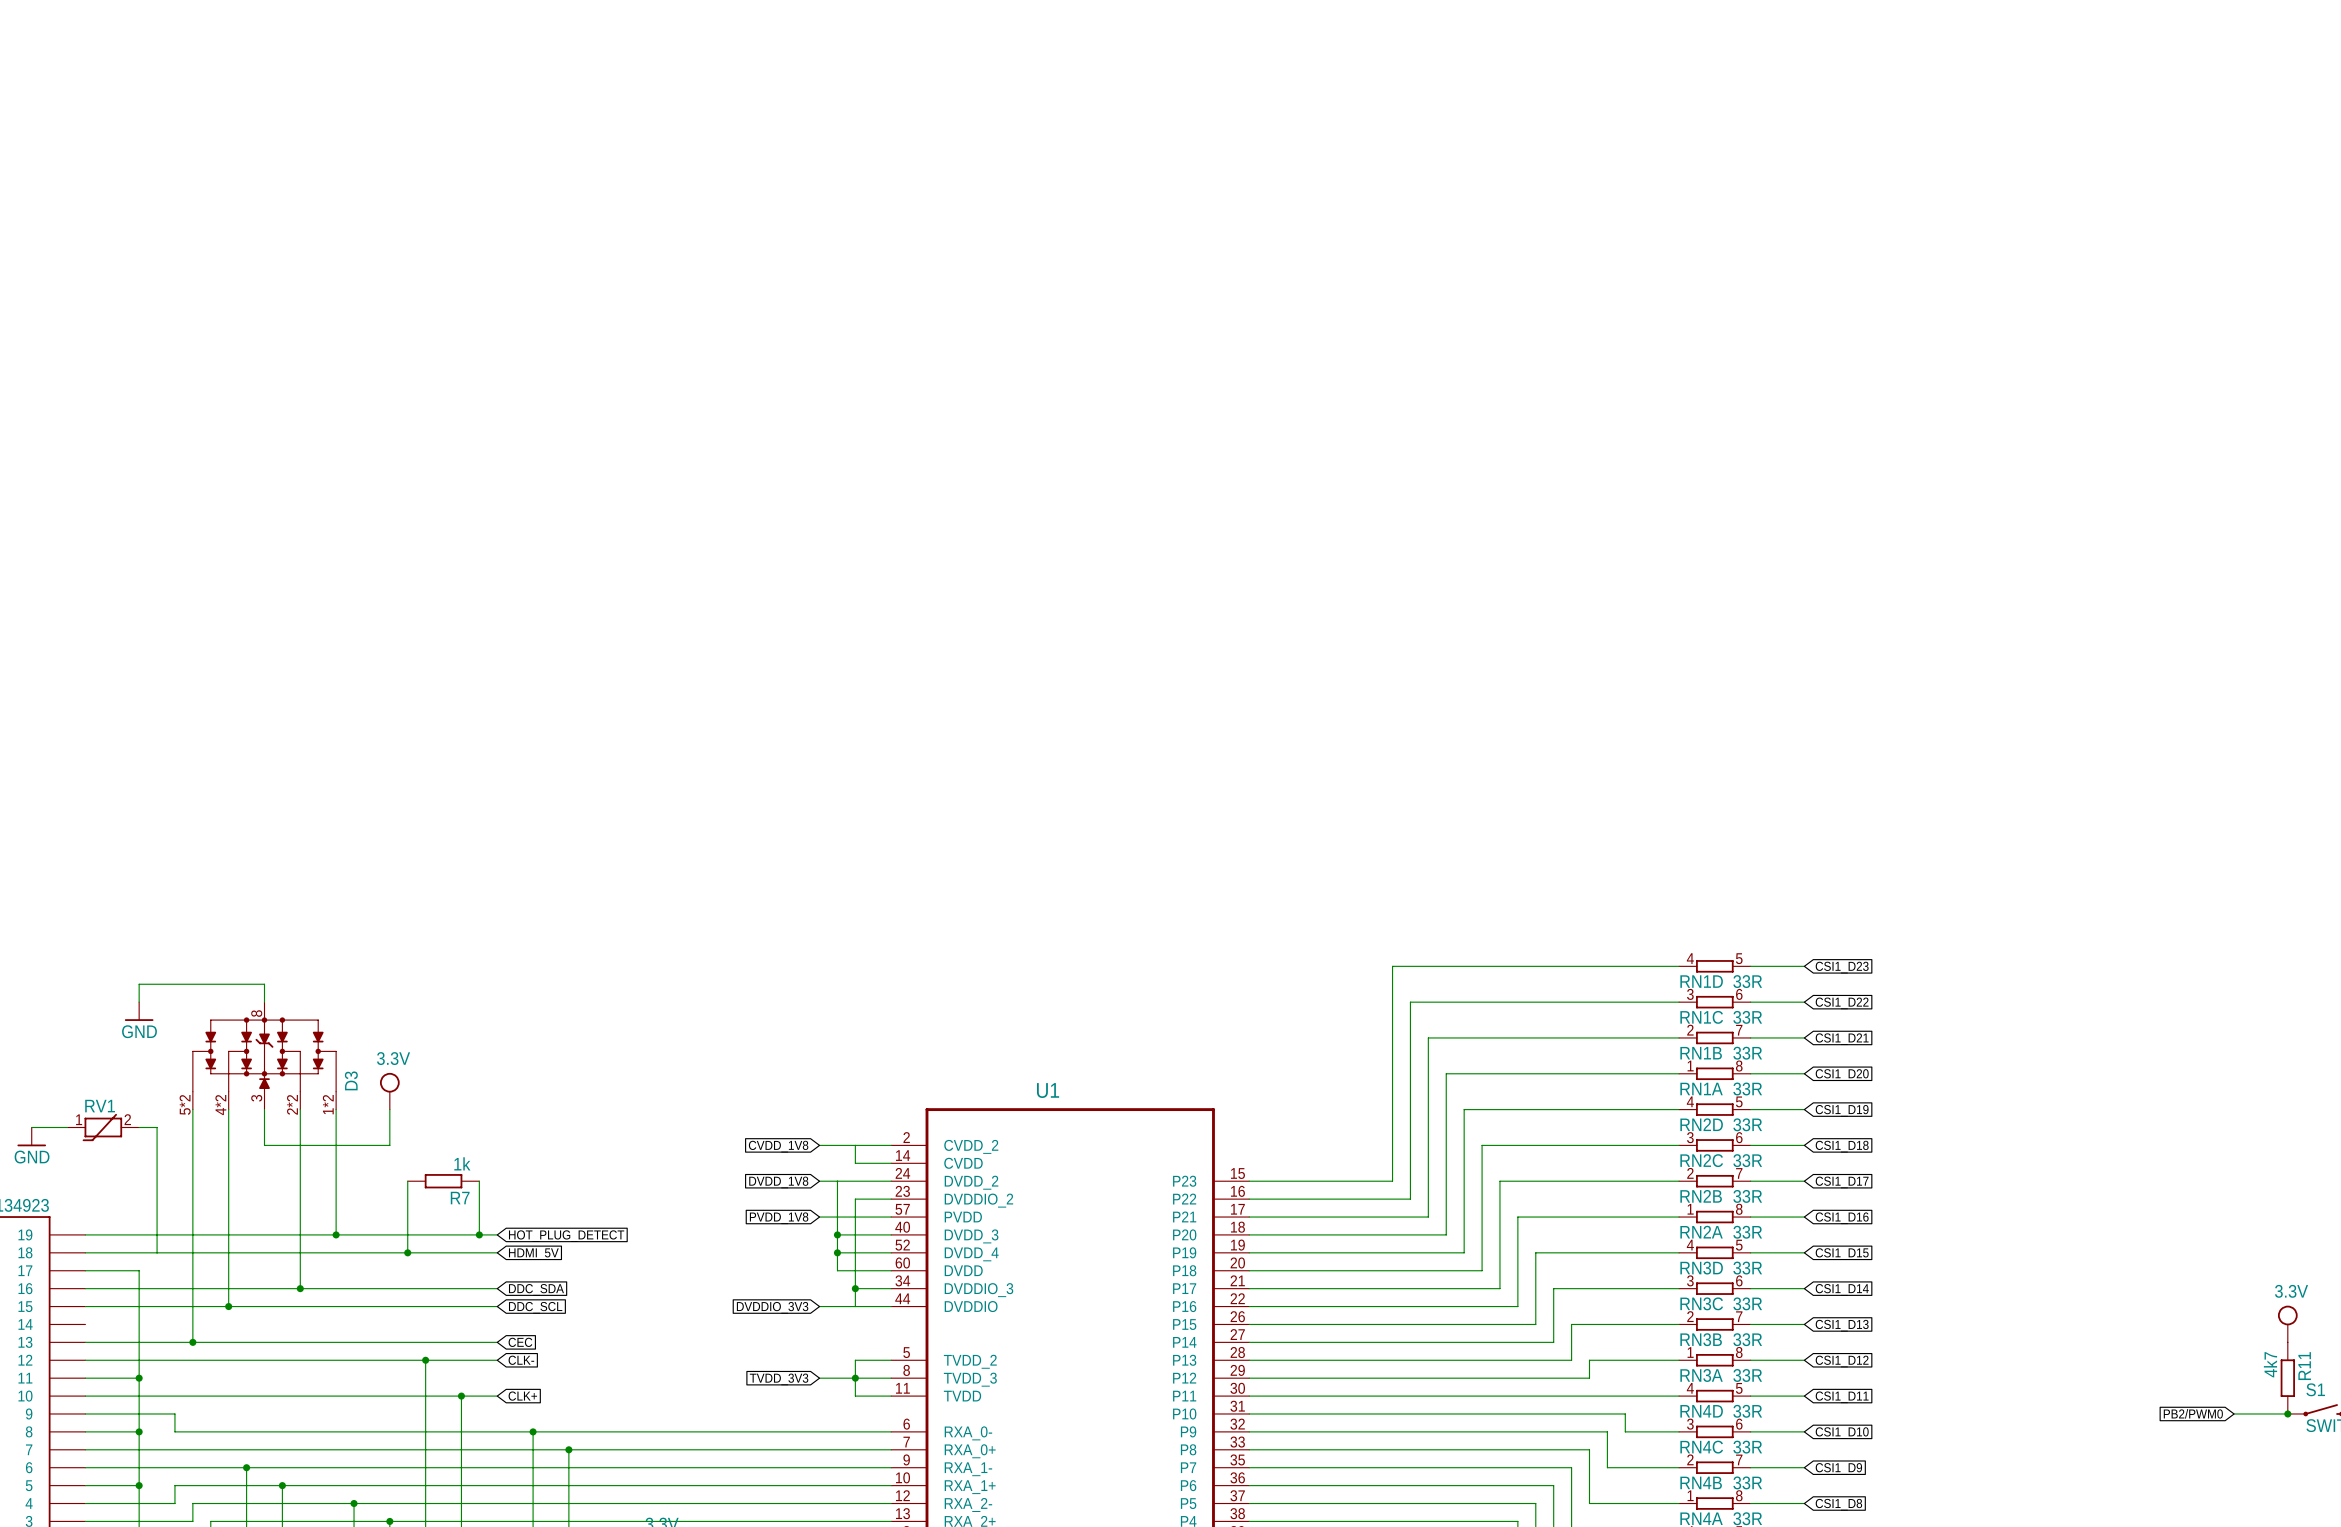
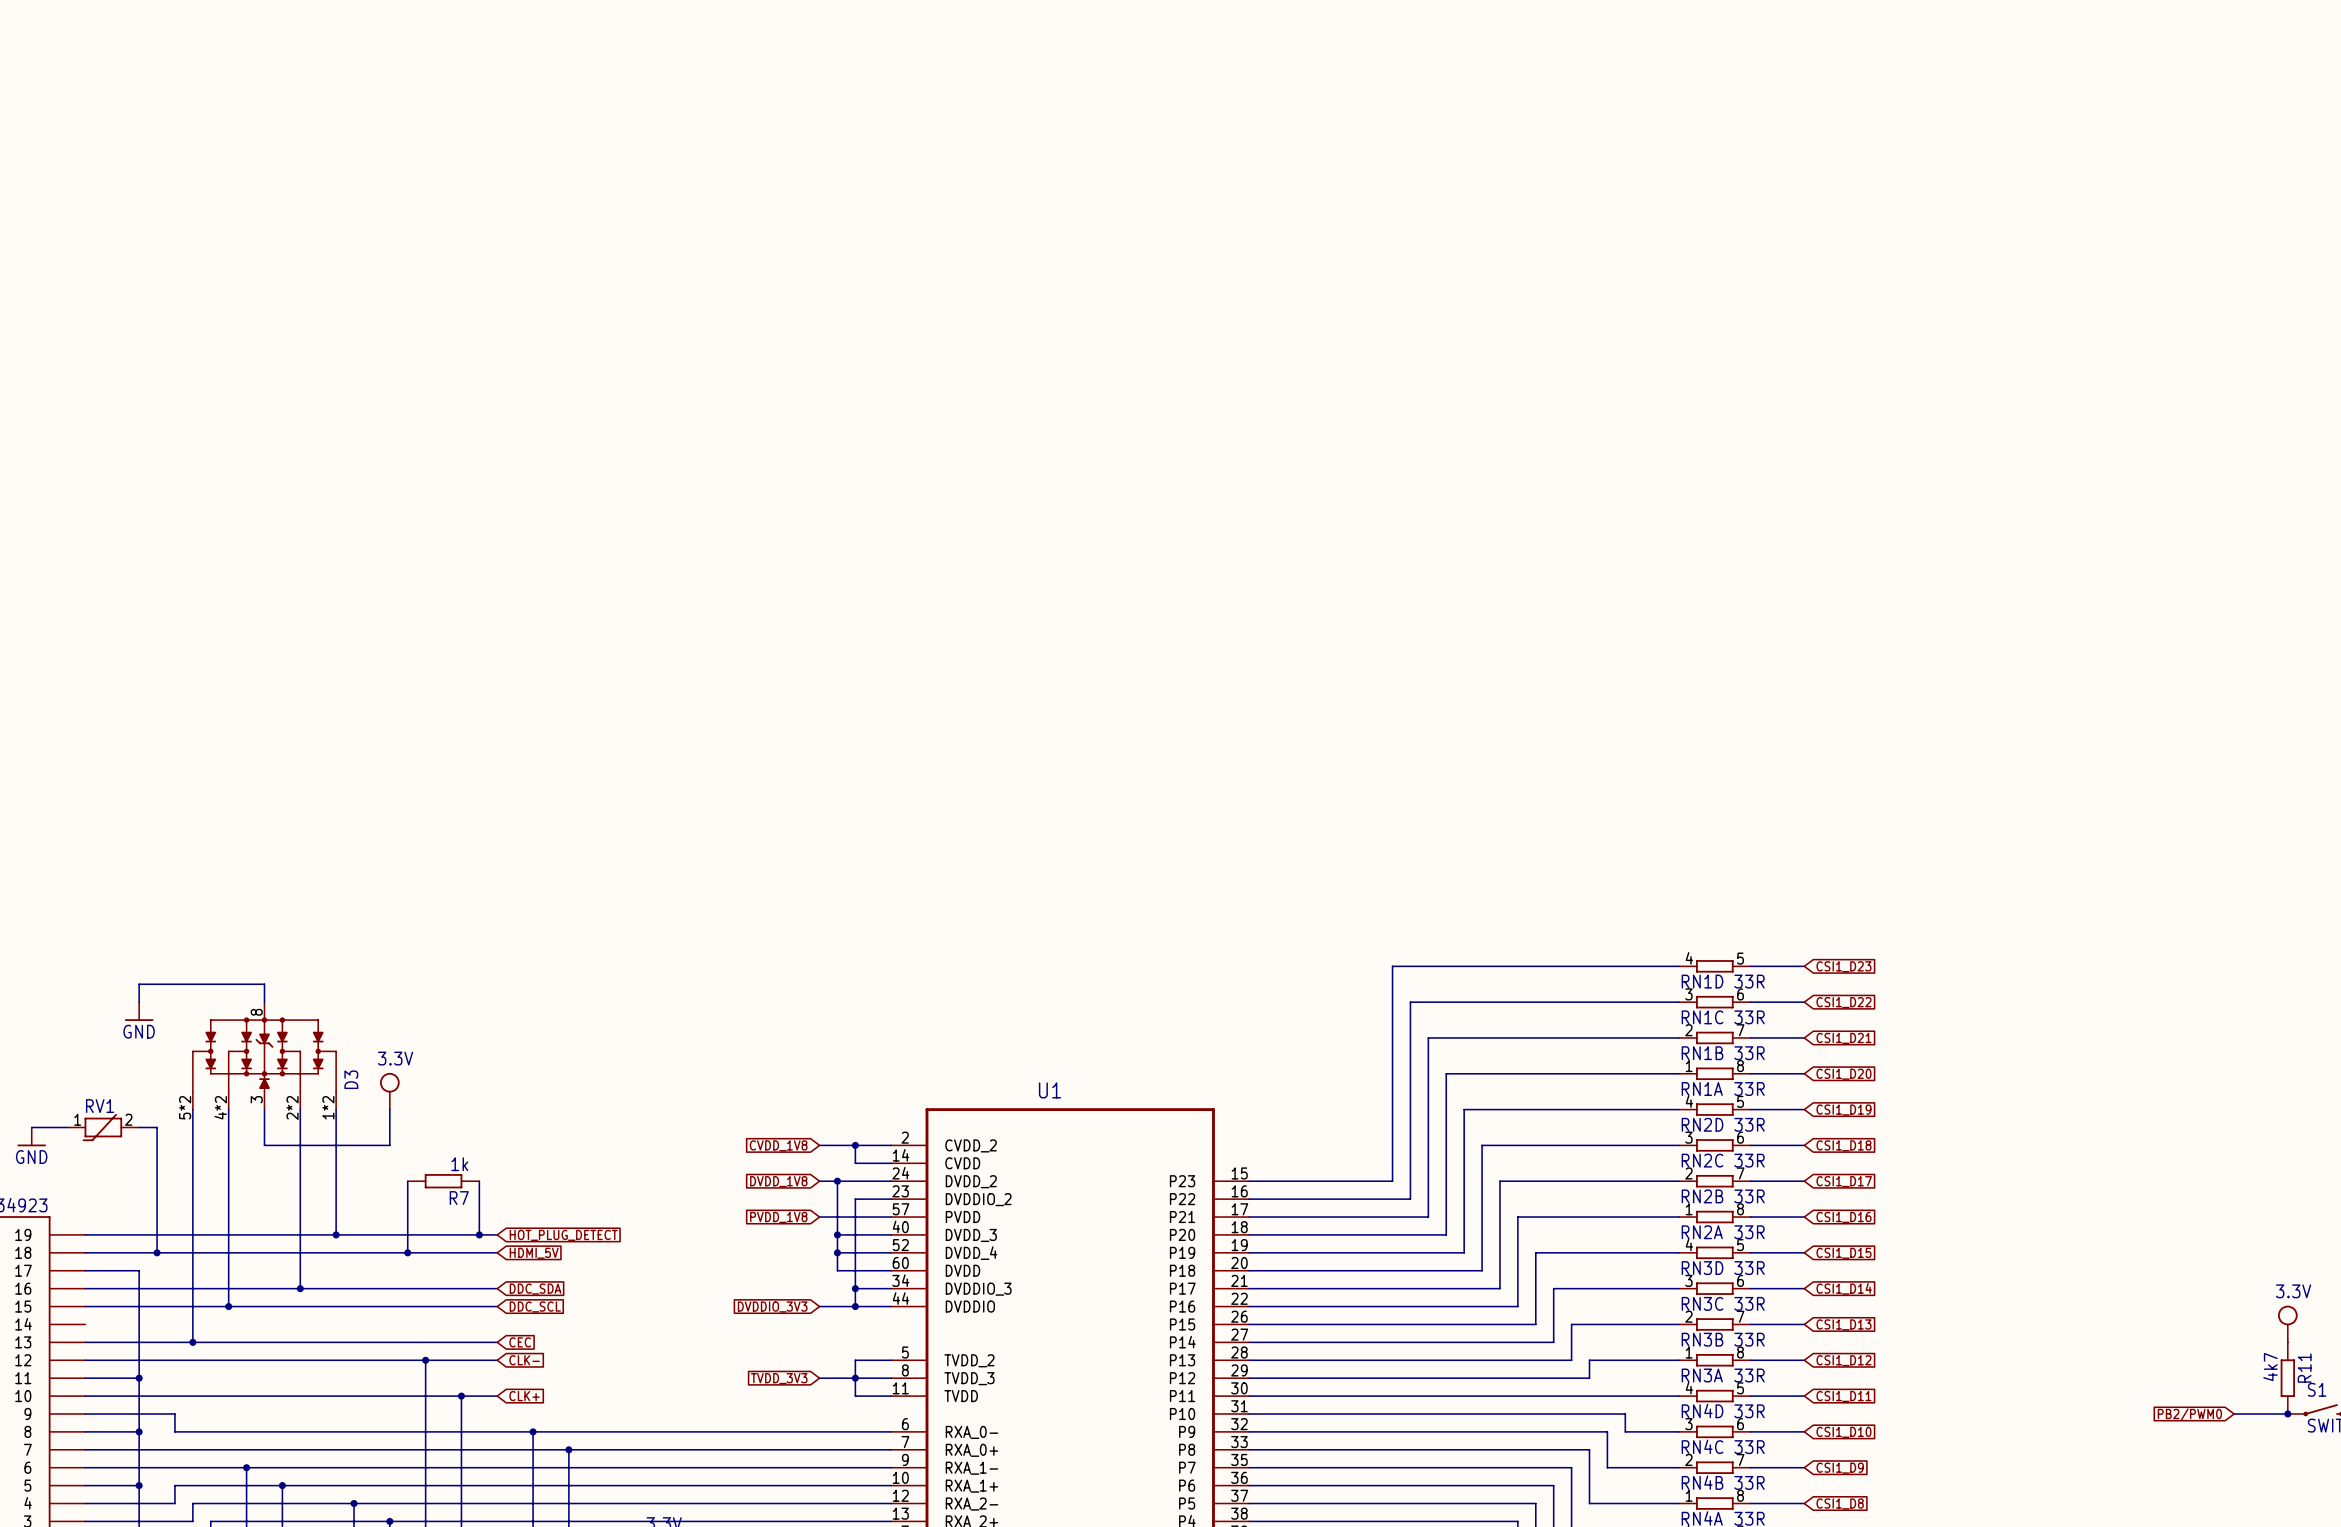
junction: none -> (855, 1145)
junction: none -> (837, 1181)
junction: none -> (157, 1252)
junction: none -> (855, 1306)

